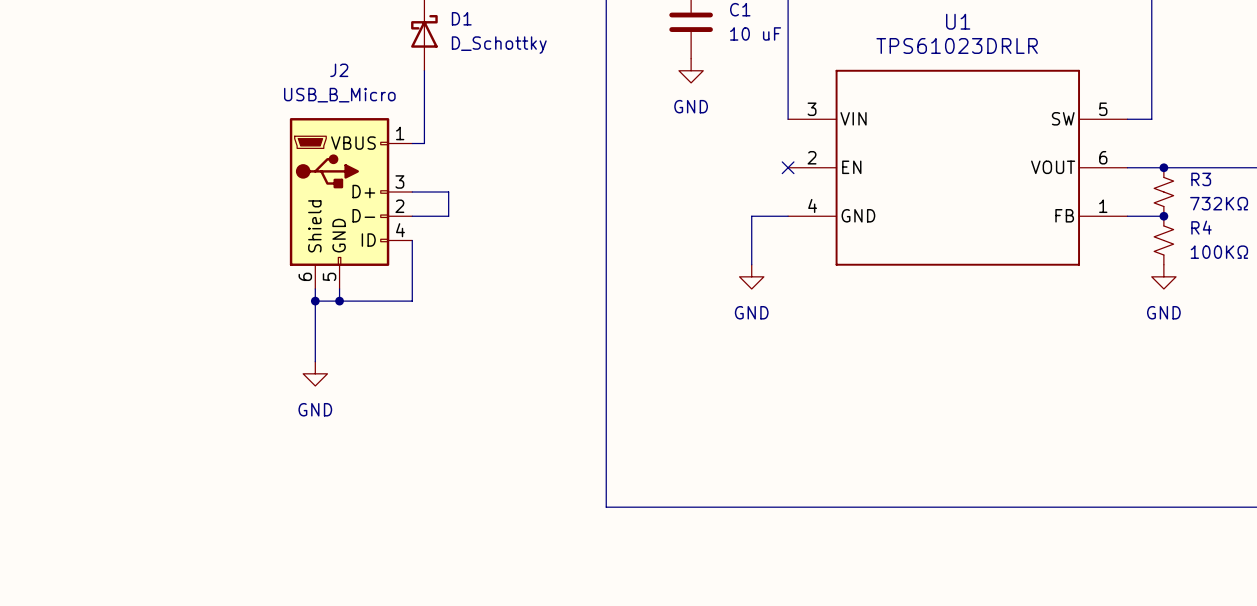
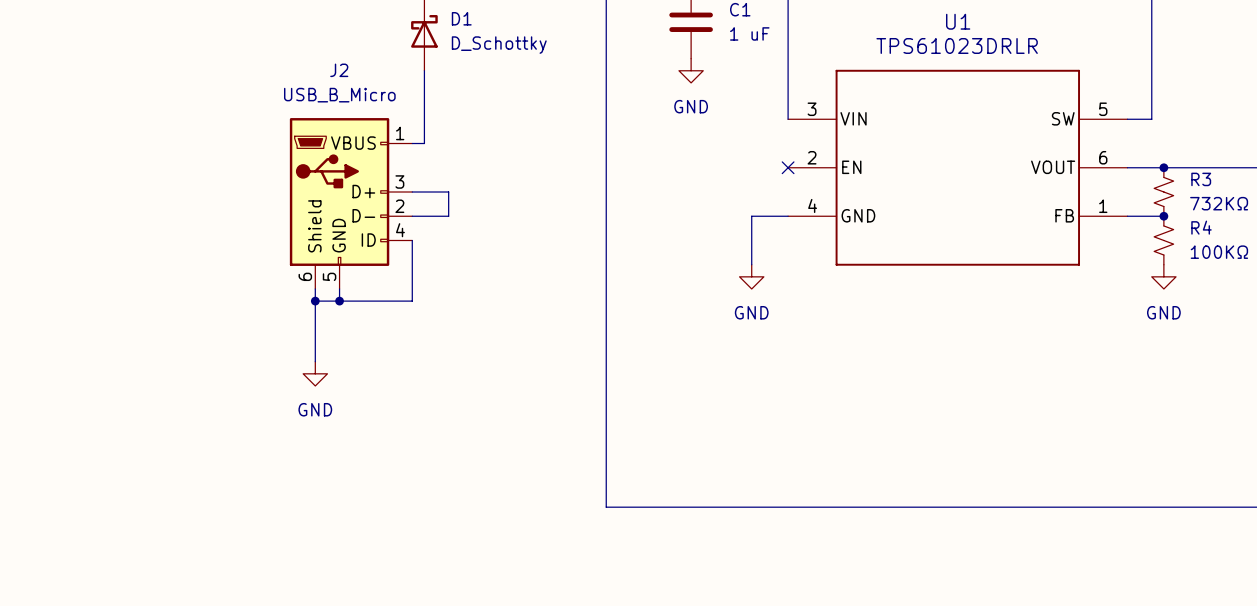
C1 value: 10 uF (755, 33) -> 1 uF (749, 33)

